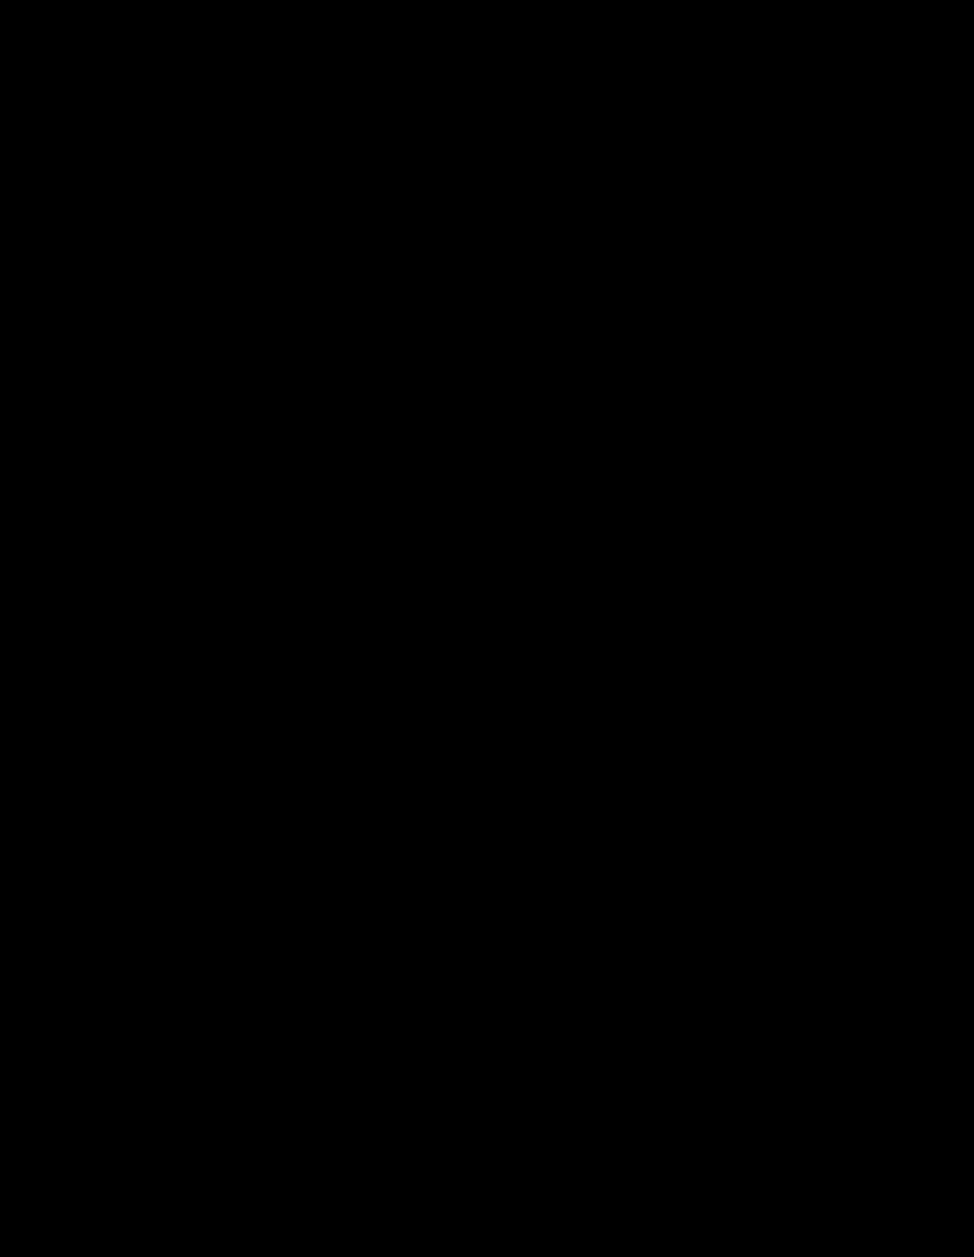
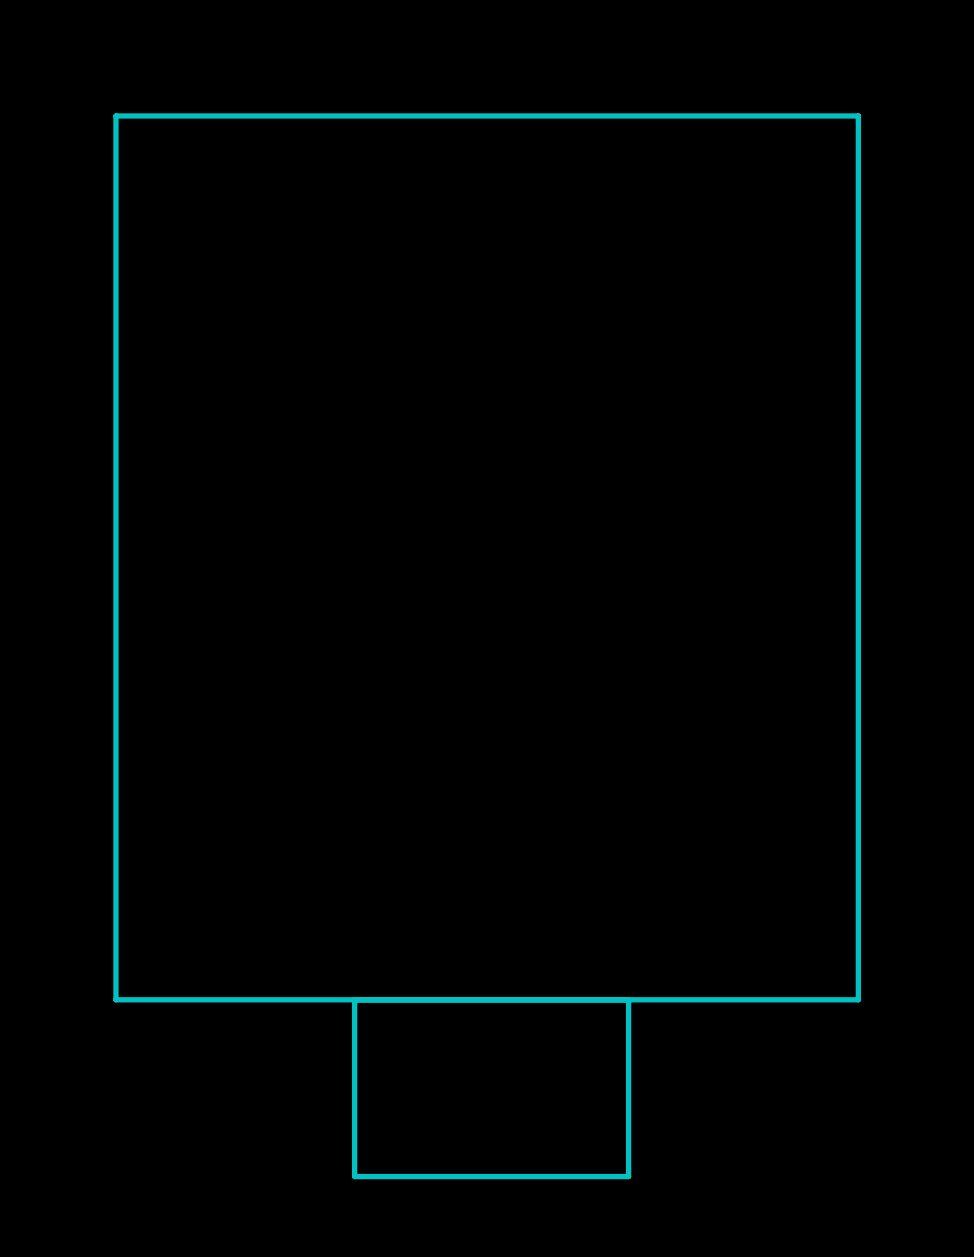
line: none -> (858, 115) (115, 115) (115, 999) (858, 999) (858, 115)
line: none -> (628, 999) (628, 1176) (354, 1176) (354, 999)

